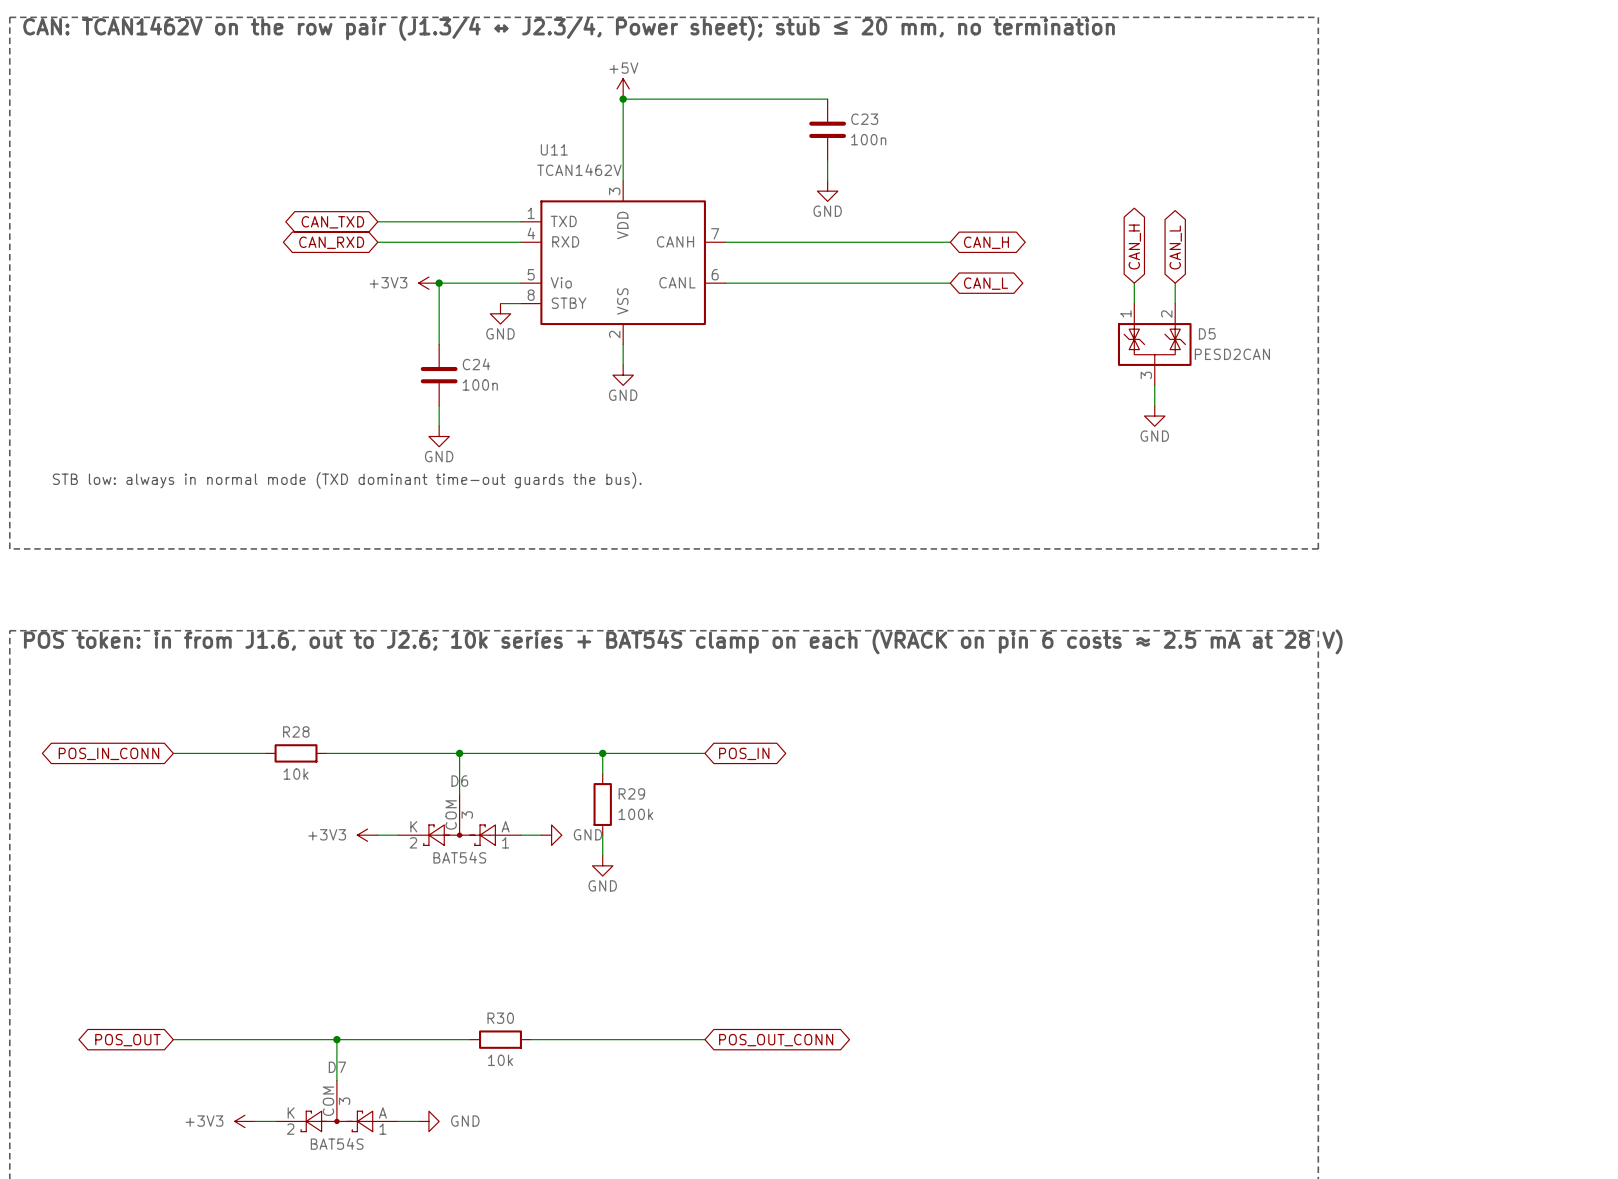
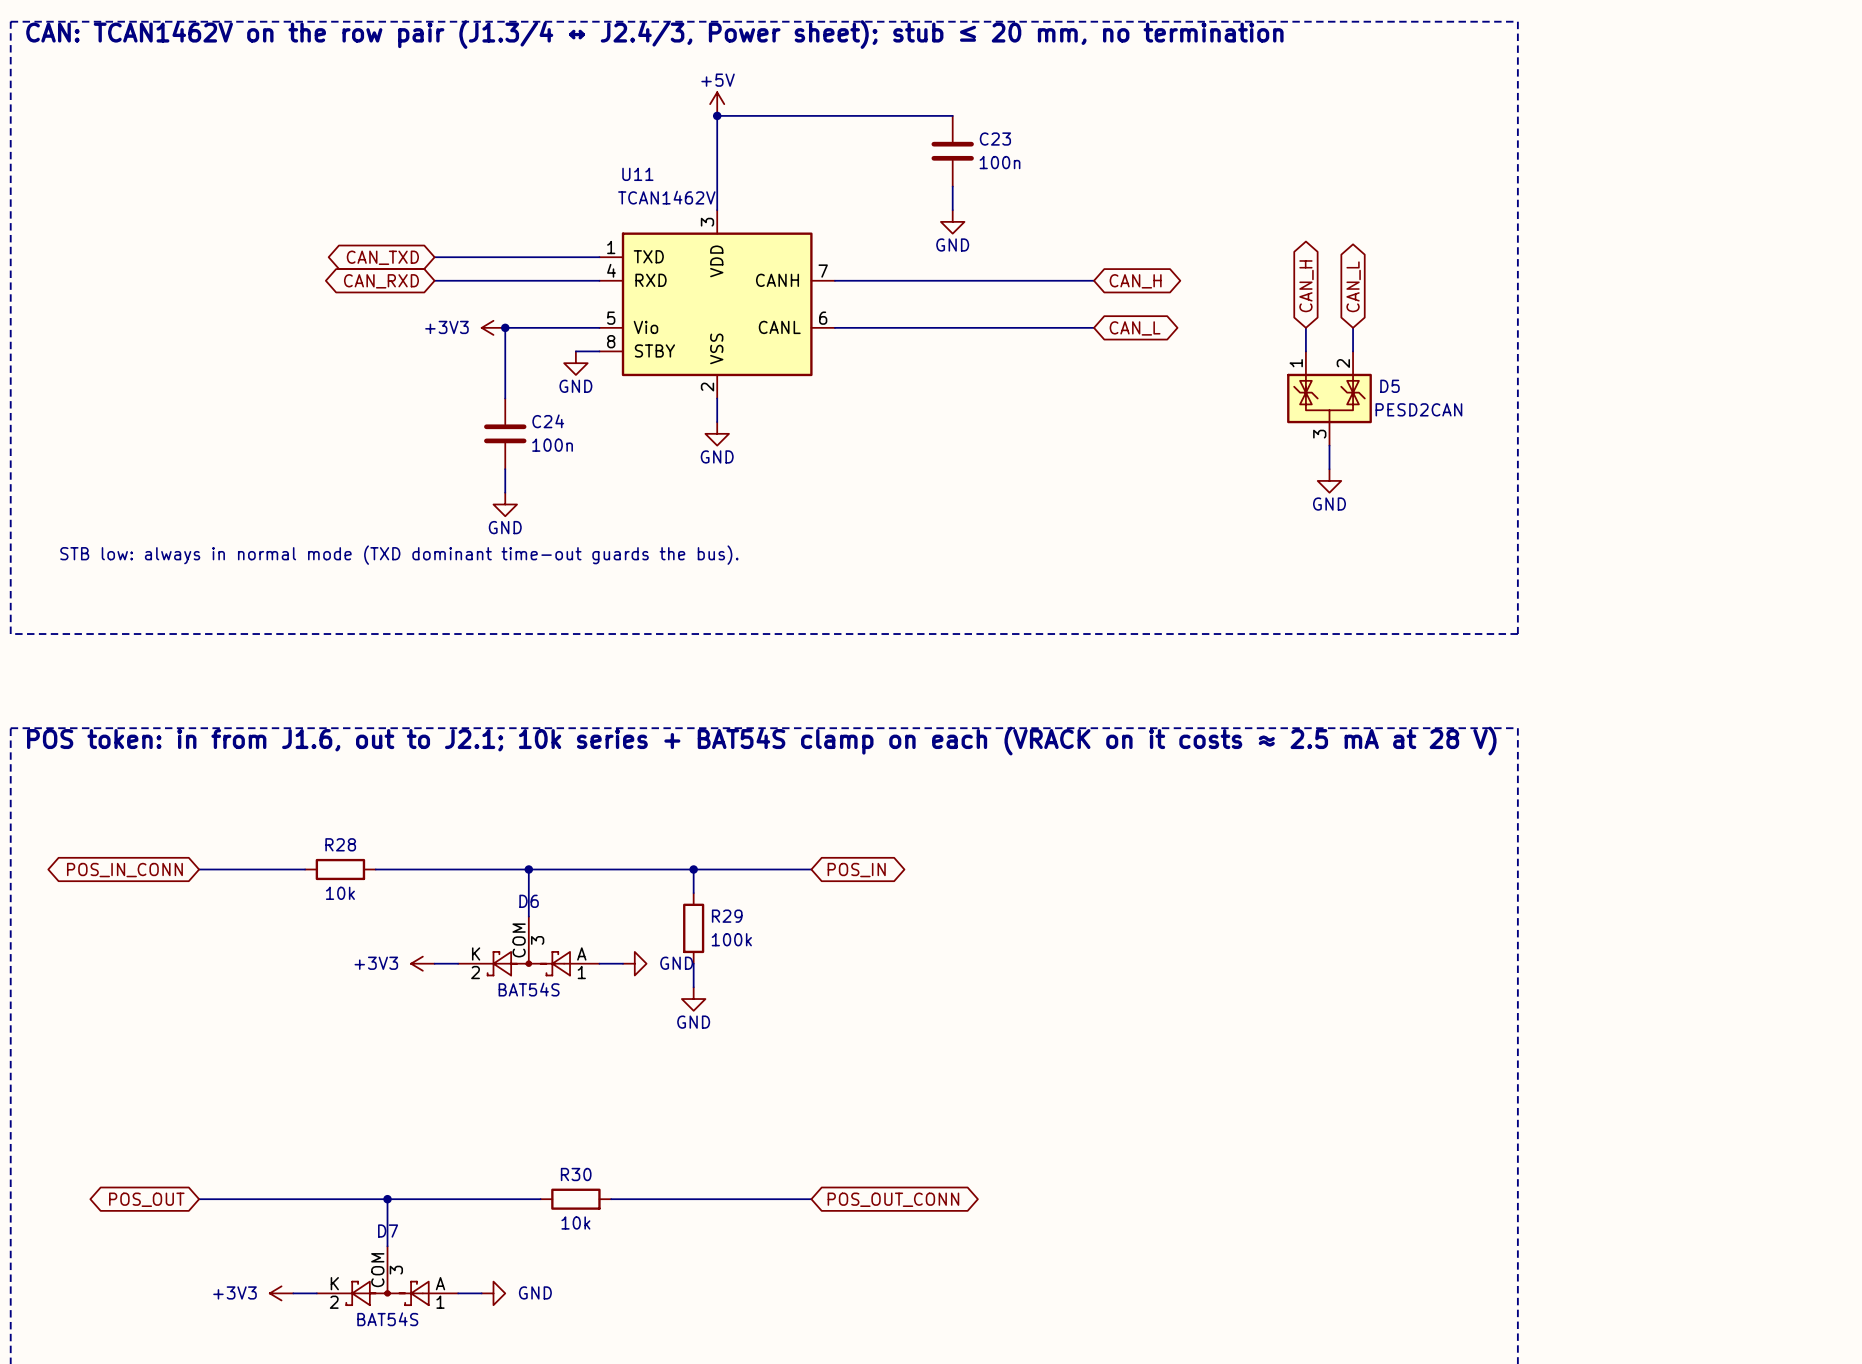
text: CAN: TCAN1462V on the row pair (J1.3/4 ↔ J2.3/4, Power sheet); stub ≤ 20 mm, no termination (569, 28) -> CAN: TCAN1462V on the row pair (J1.3/4 ↔ J2.4/3, Power sheet); stub ≤ 20 mm, no termination (654, 34)
text: POS token: in from J1.6, out to J2.6; 10k series + BAT54S clamp on each (VRACK on pin 6 costs ≈ 2.5 mA at 28 V) (683, 641) -> POS token: in from J1.6, out to J2.1; 10k series + BAT54S clamp on each (VRACK on it costs ≈ 2.5 mA at 28 V) (761, 741)

